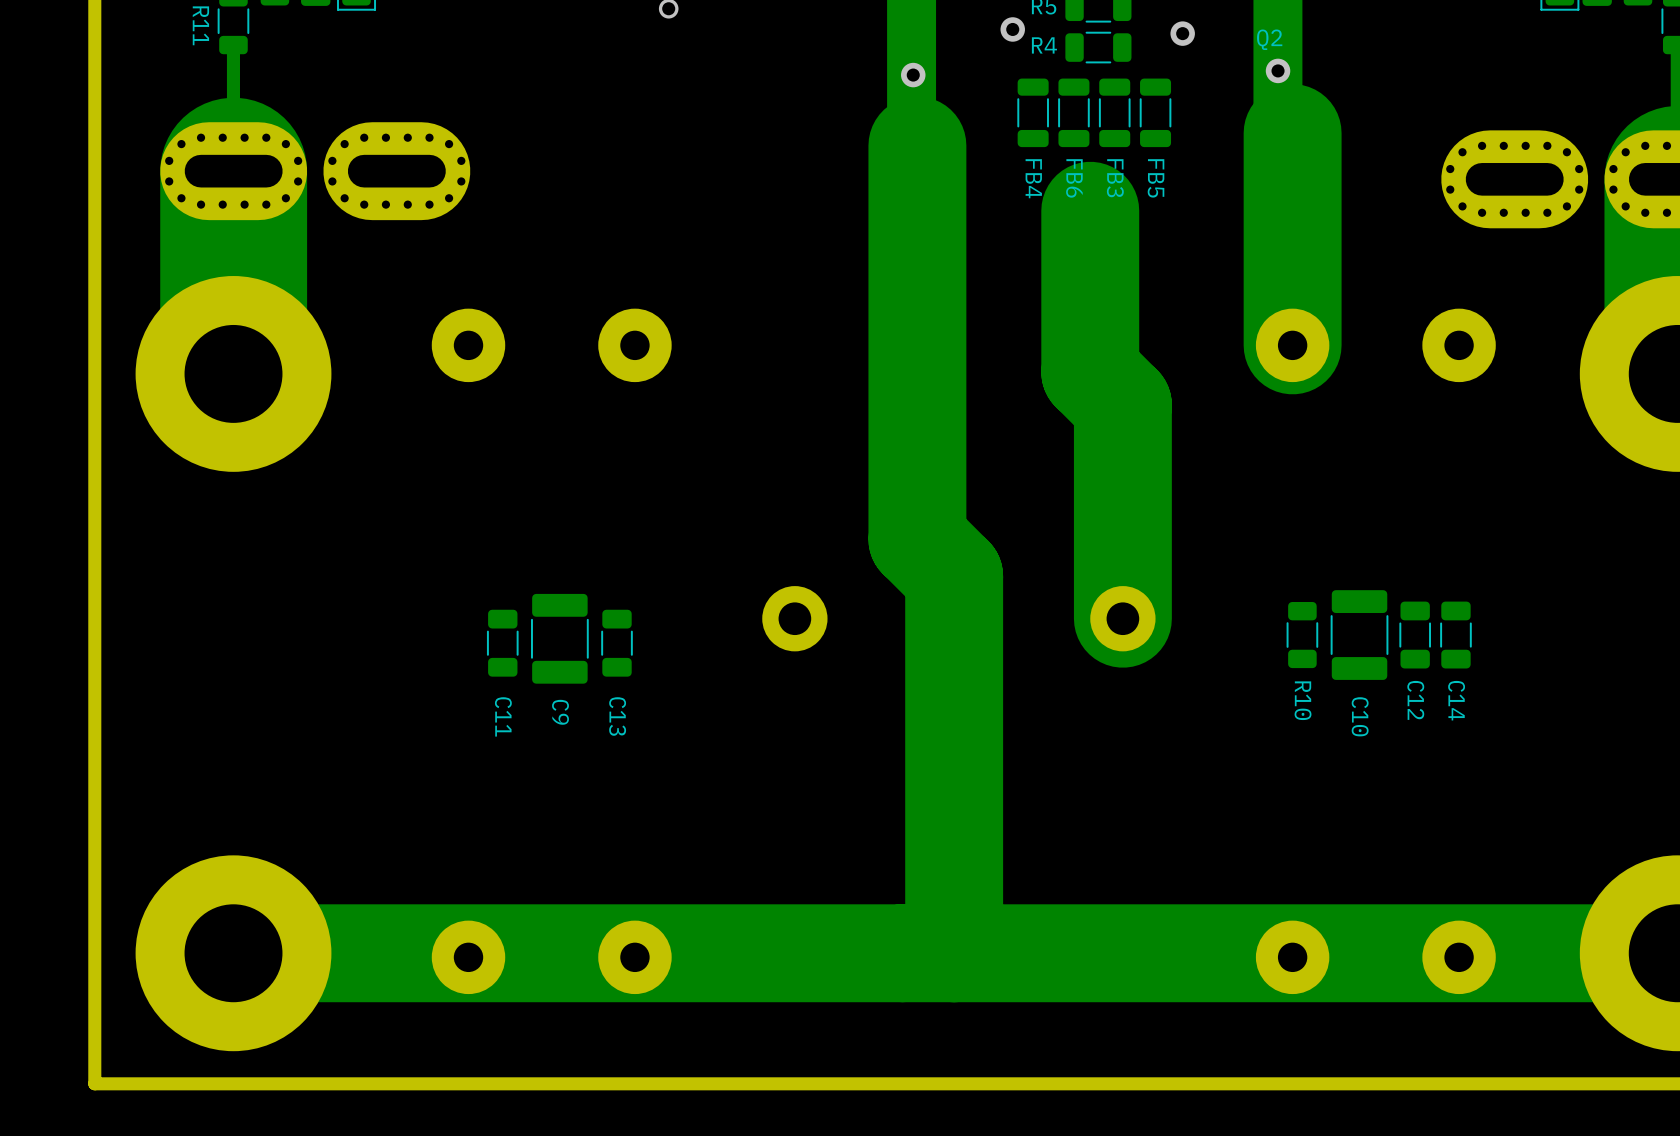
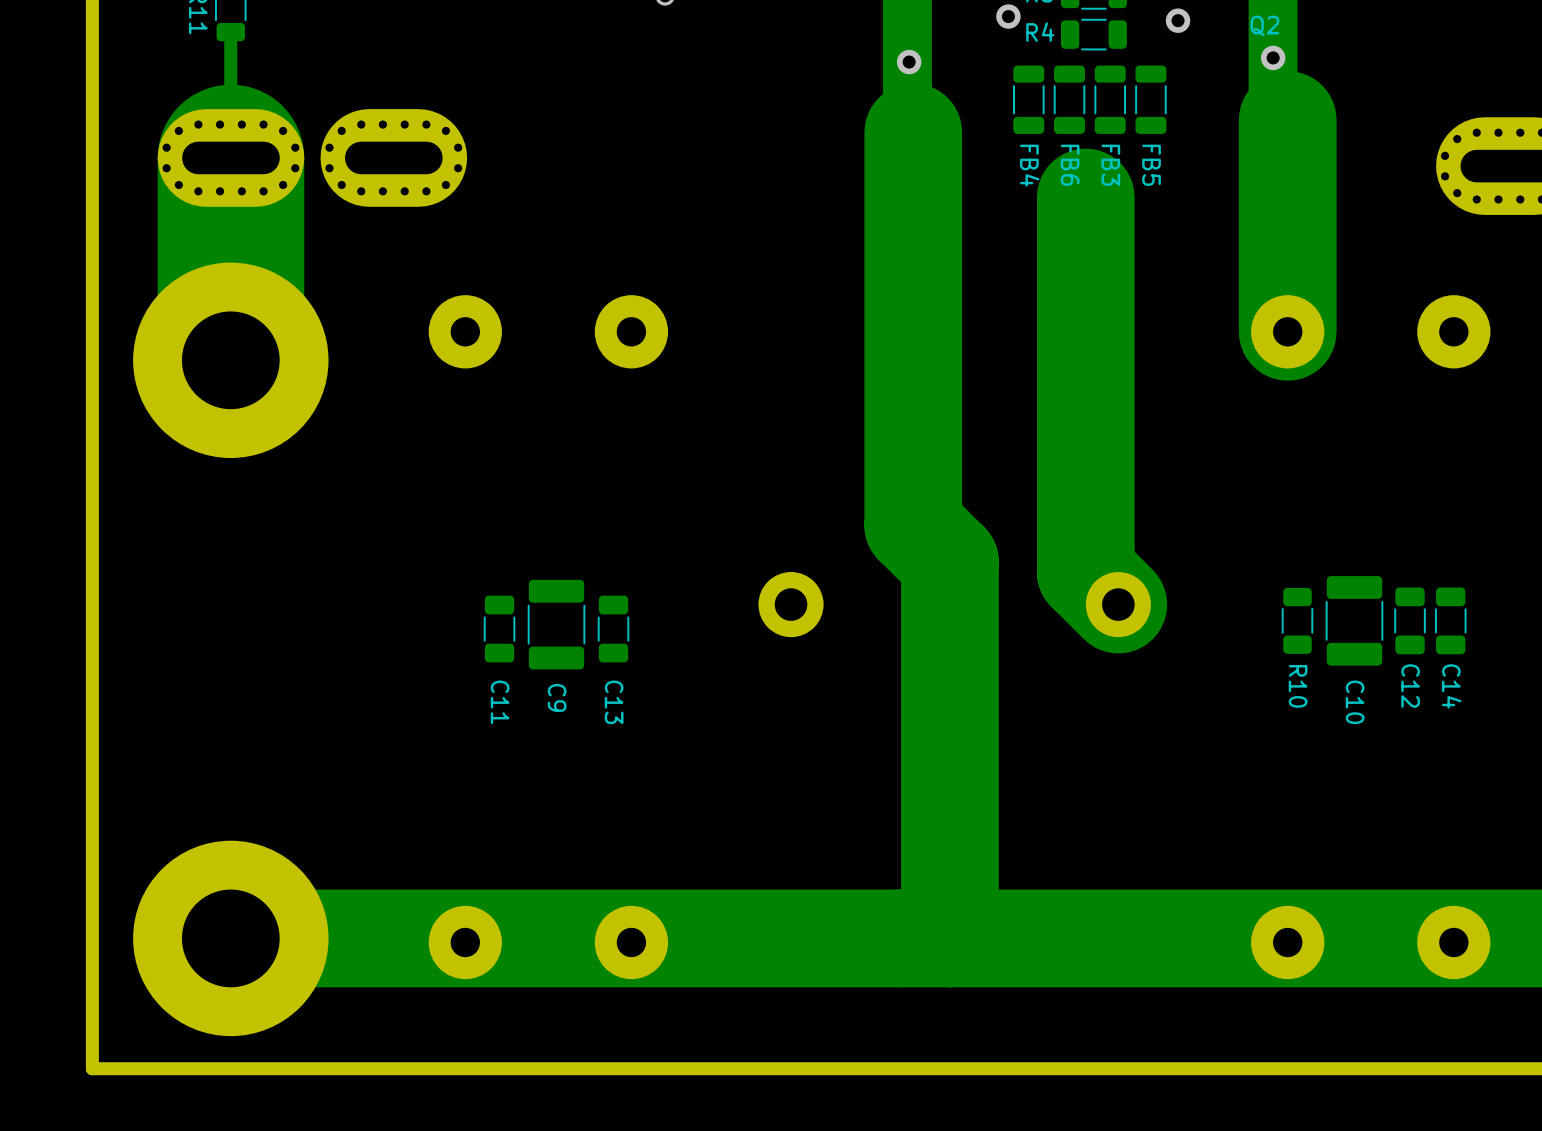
track: (1090, 372) (1122, 404) (1122, 618) -> (1085, 358) (1085, 572) (1118, 604)

